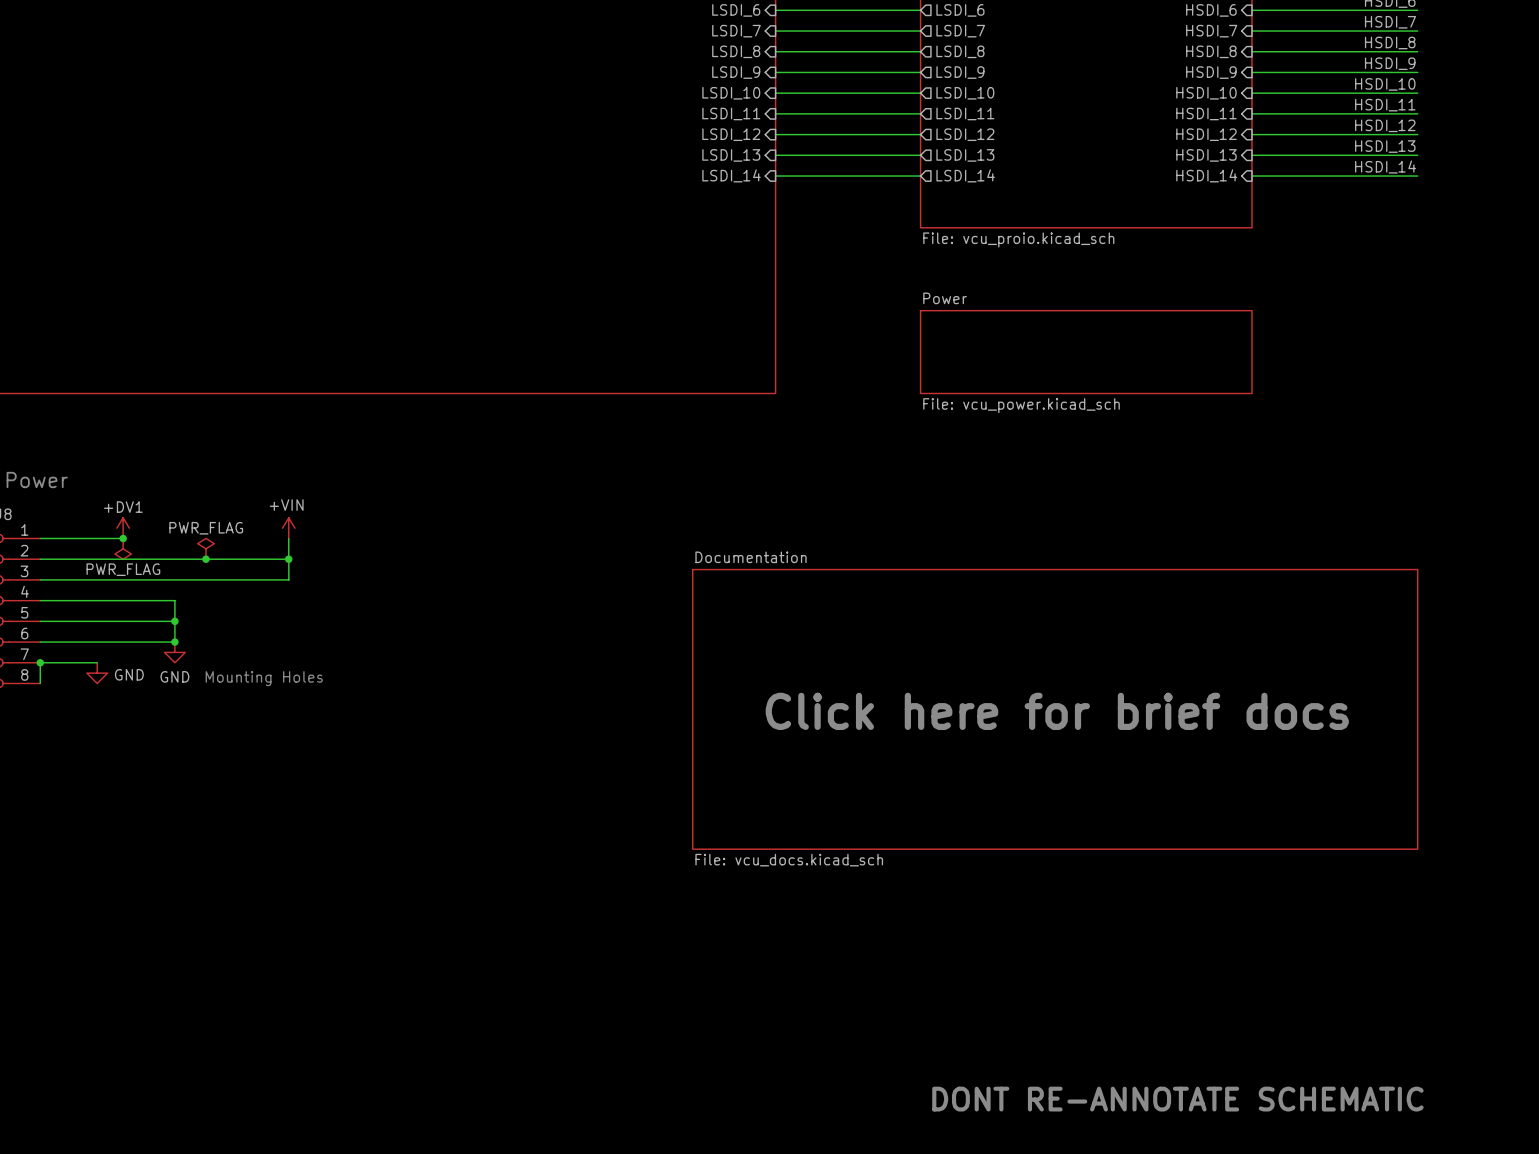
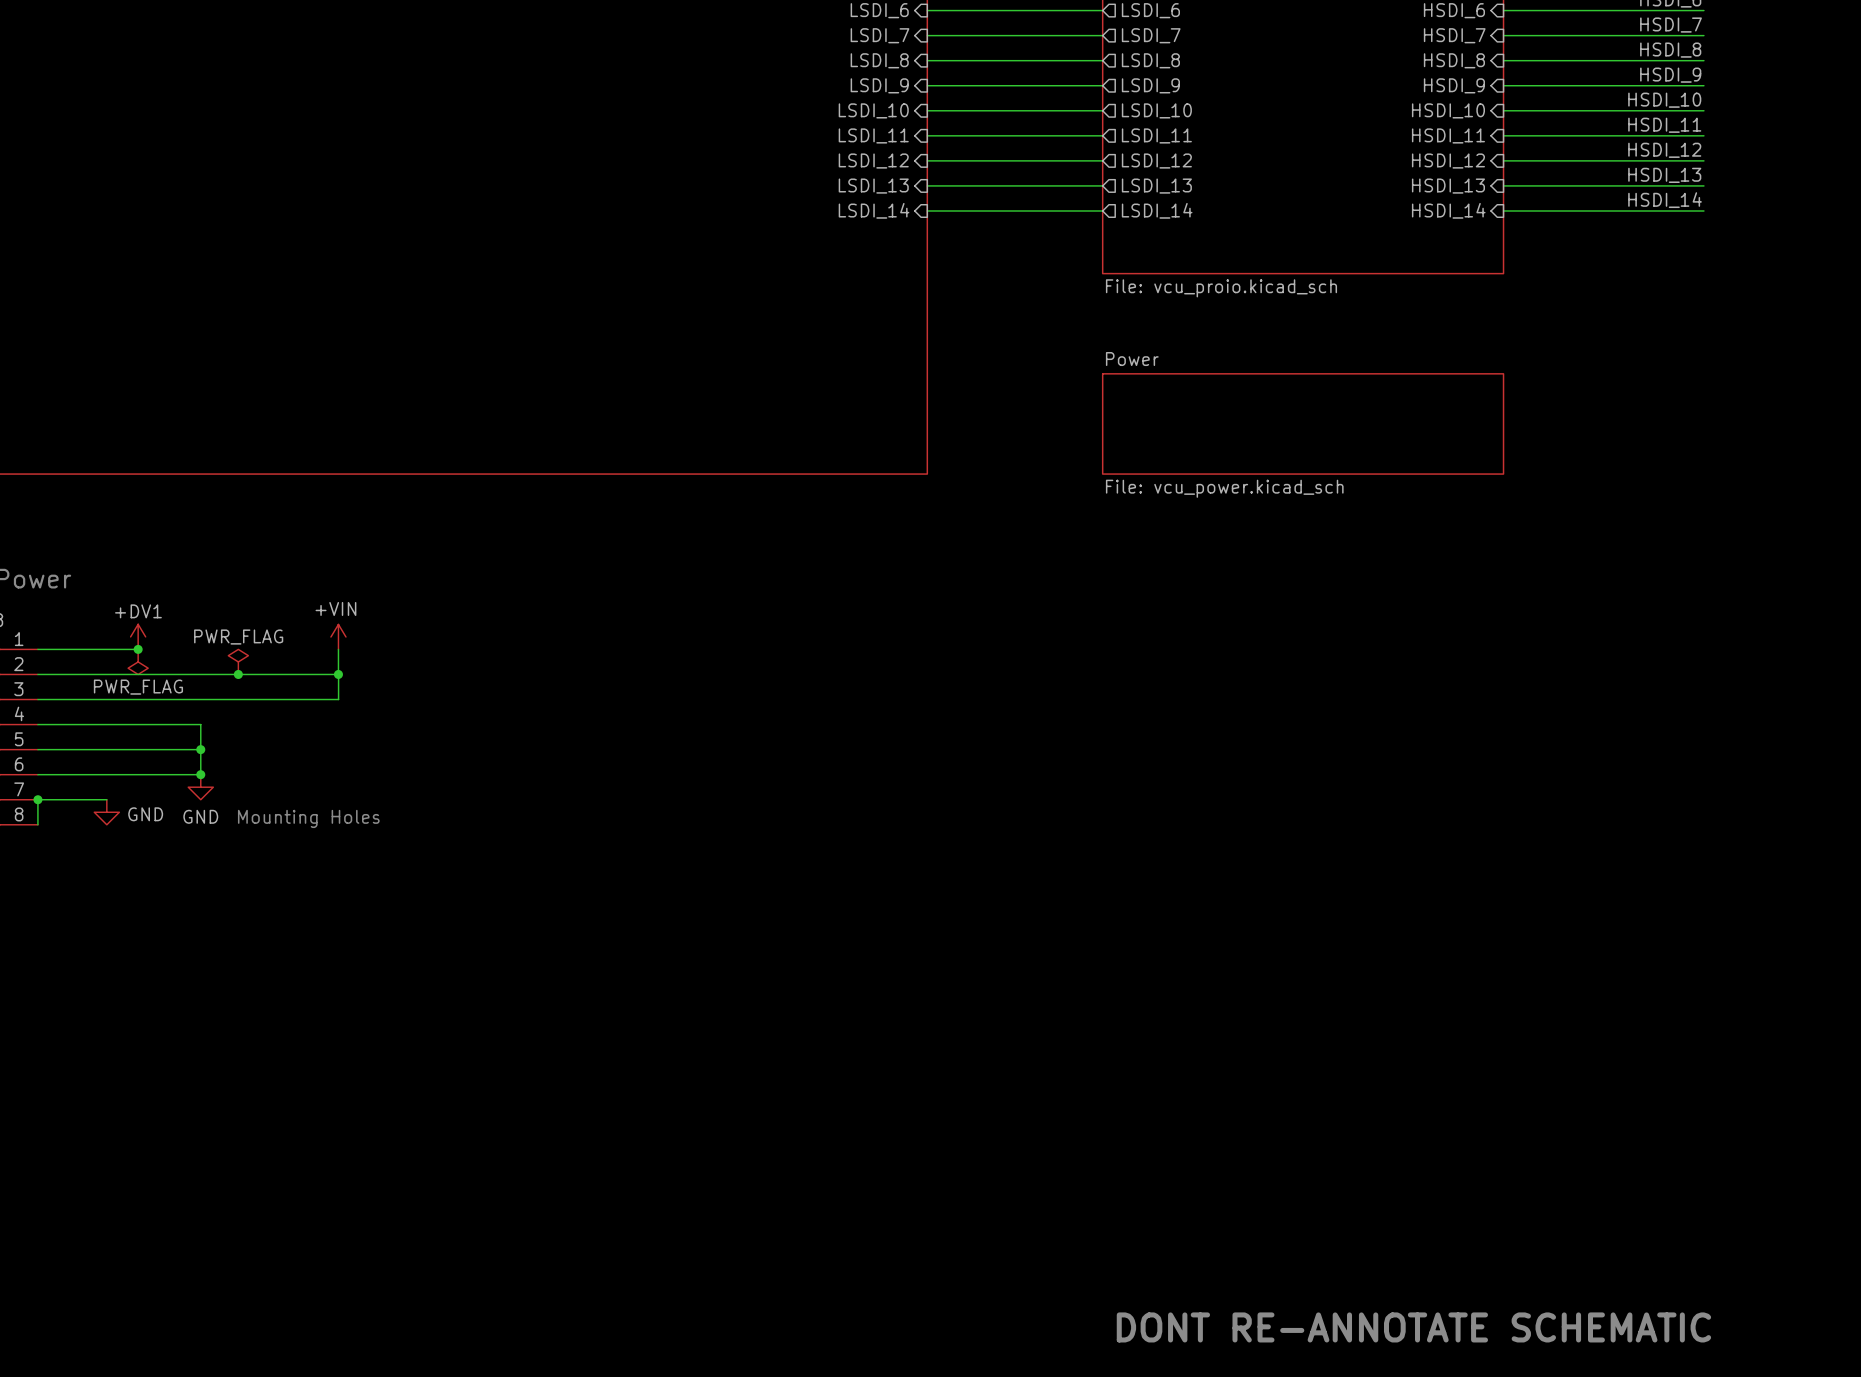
sheet Documentation: File: vcu_docs.kicad_sch (1055, 709) -> none
text: Click here for brief docs (1057, 711) -> none

